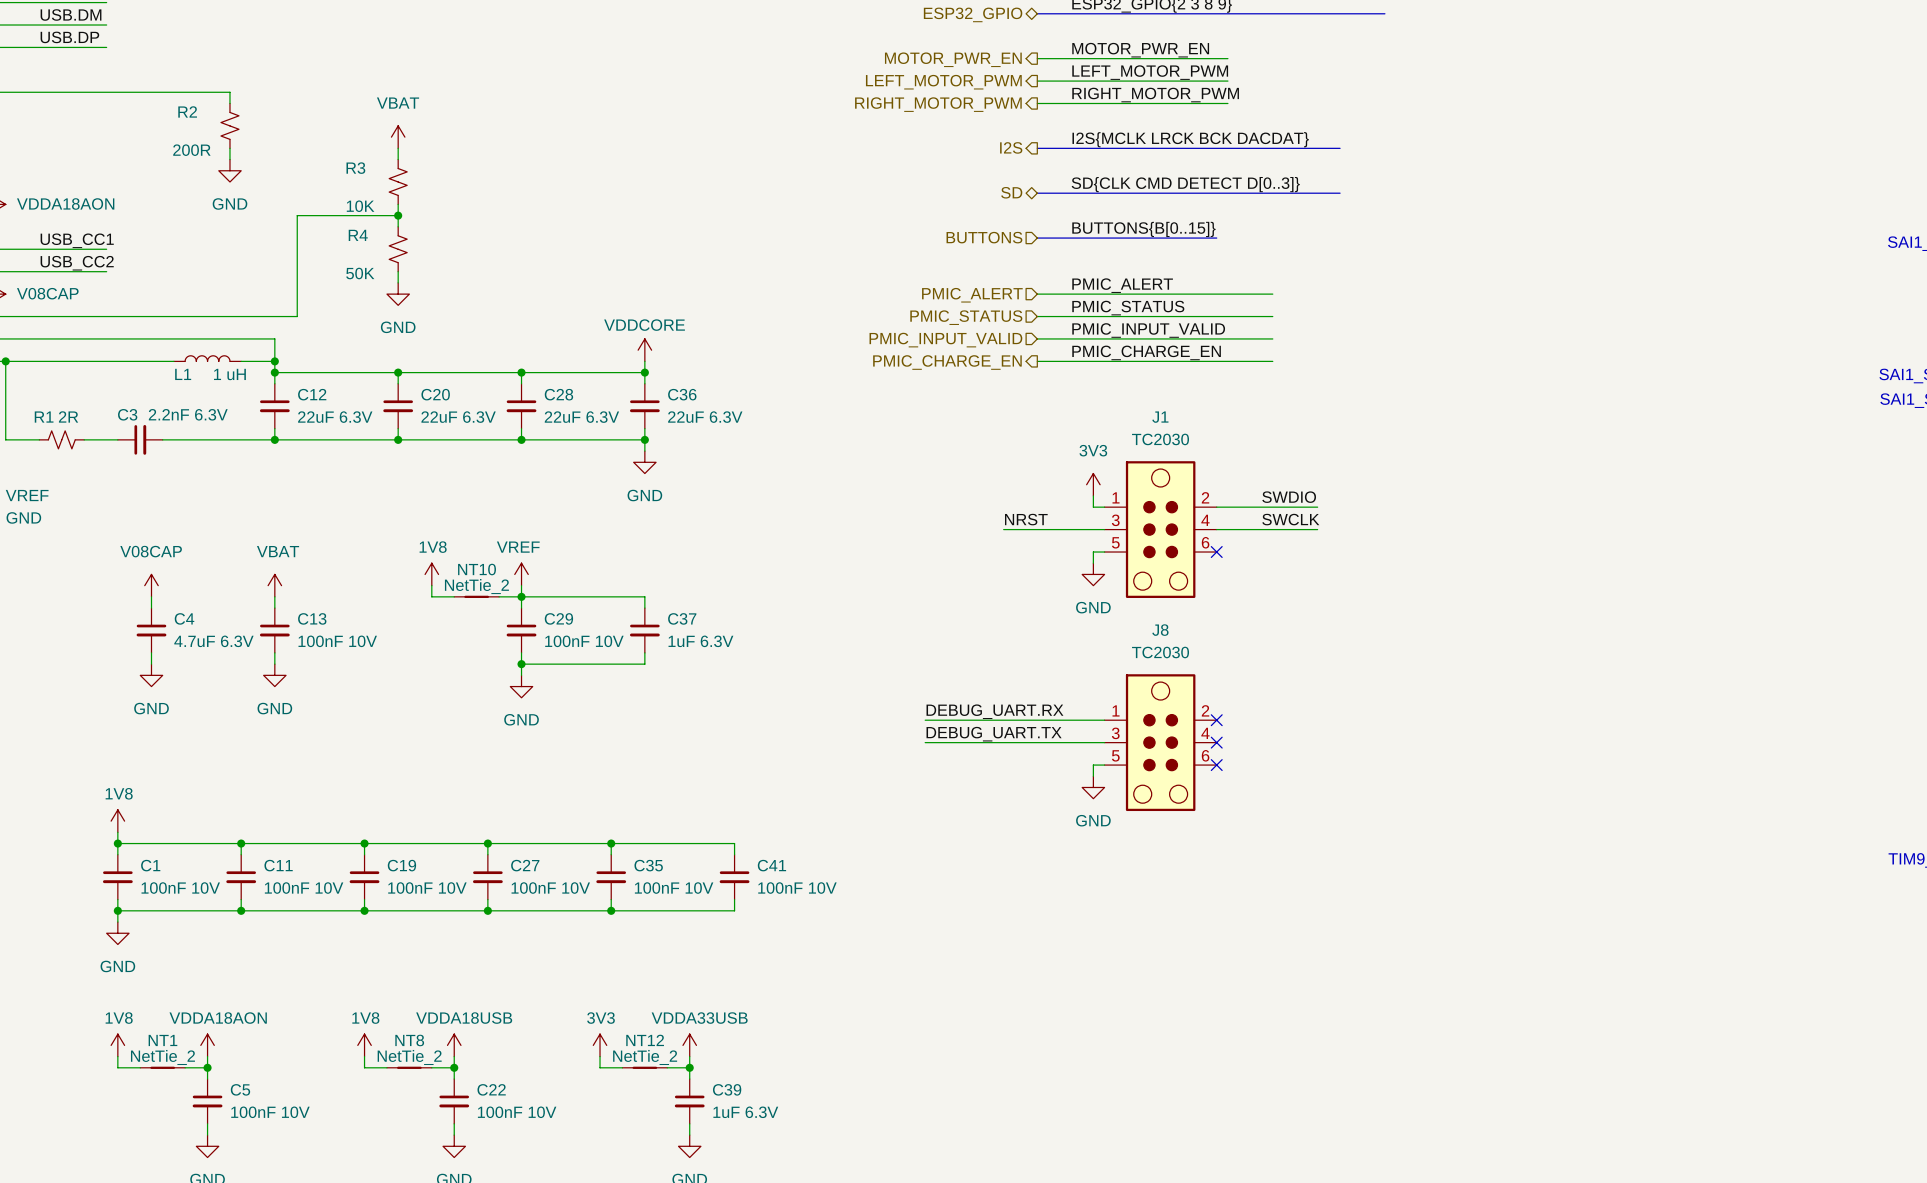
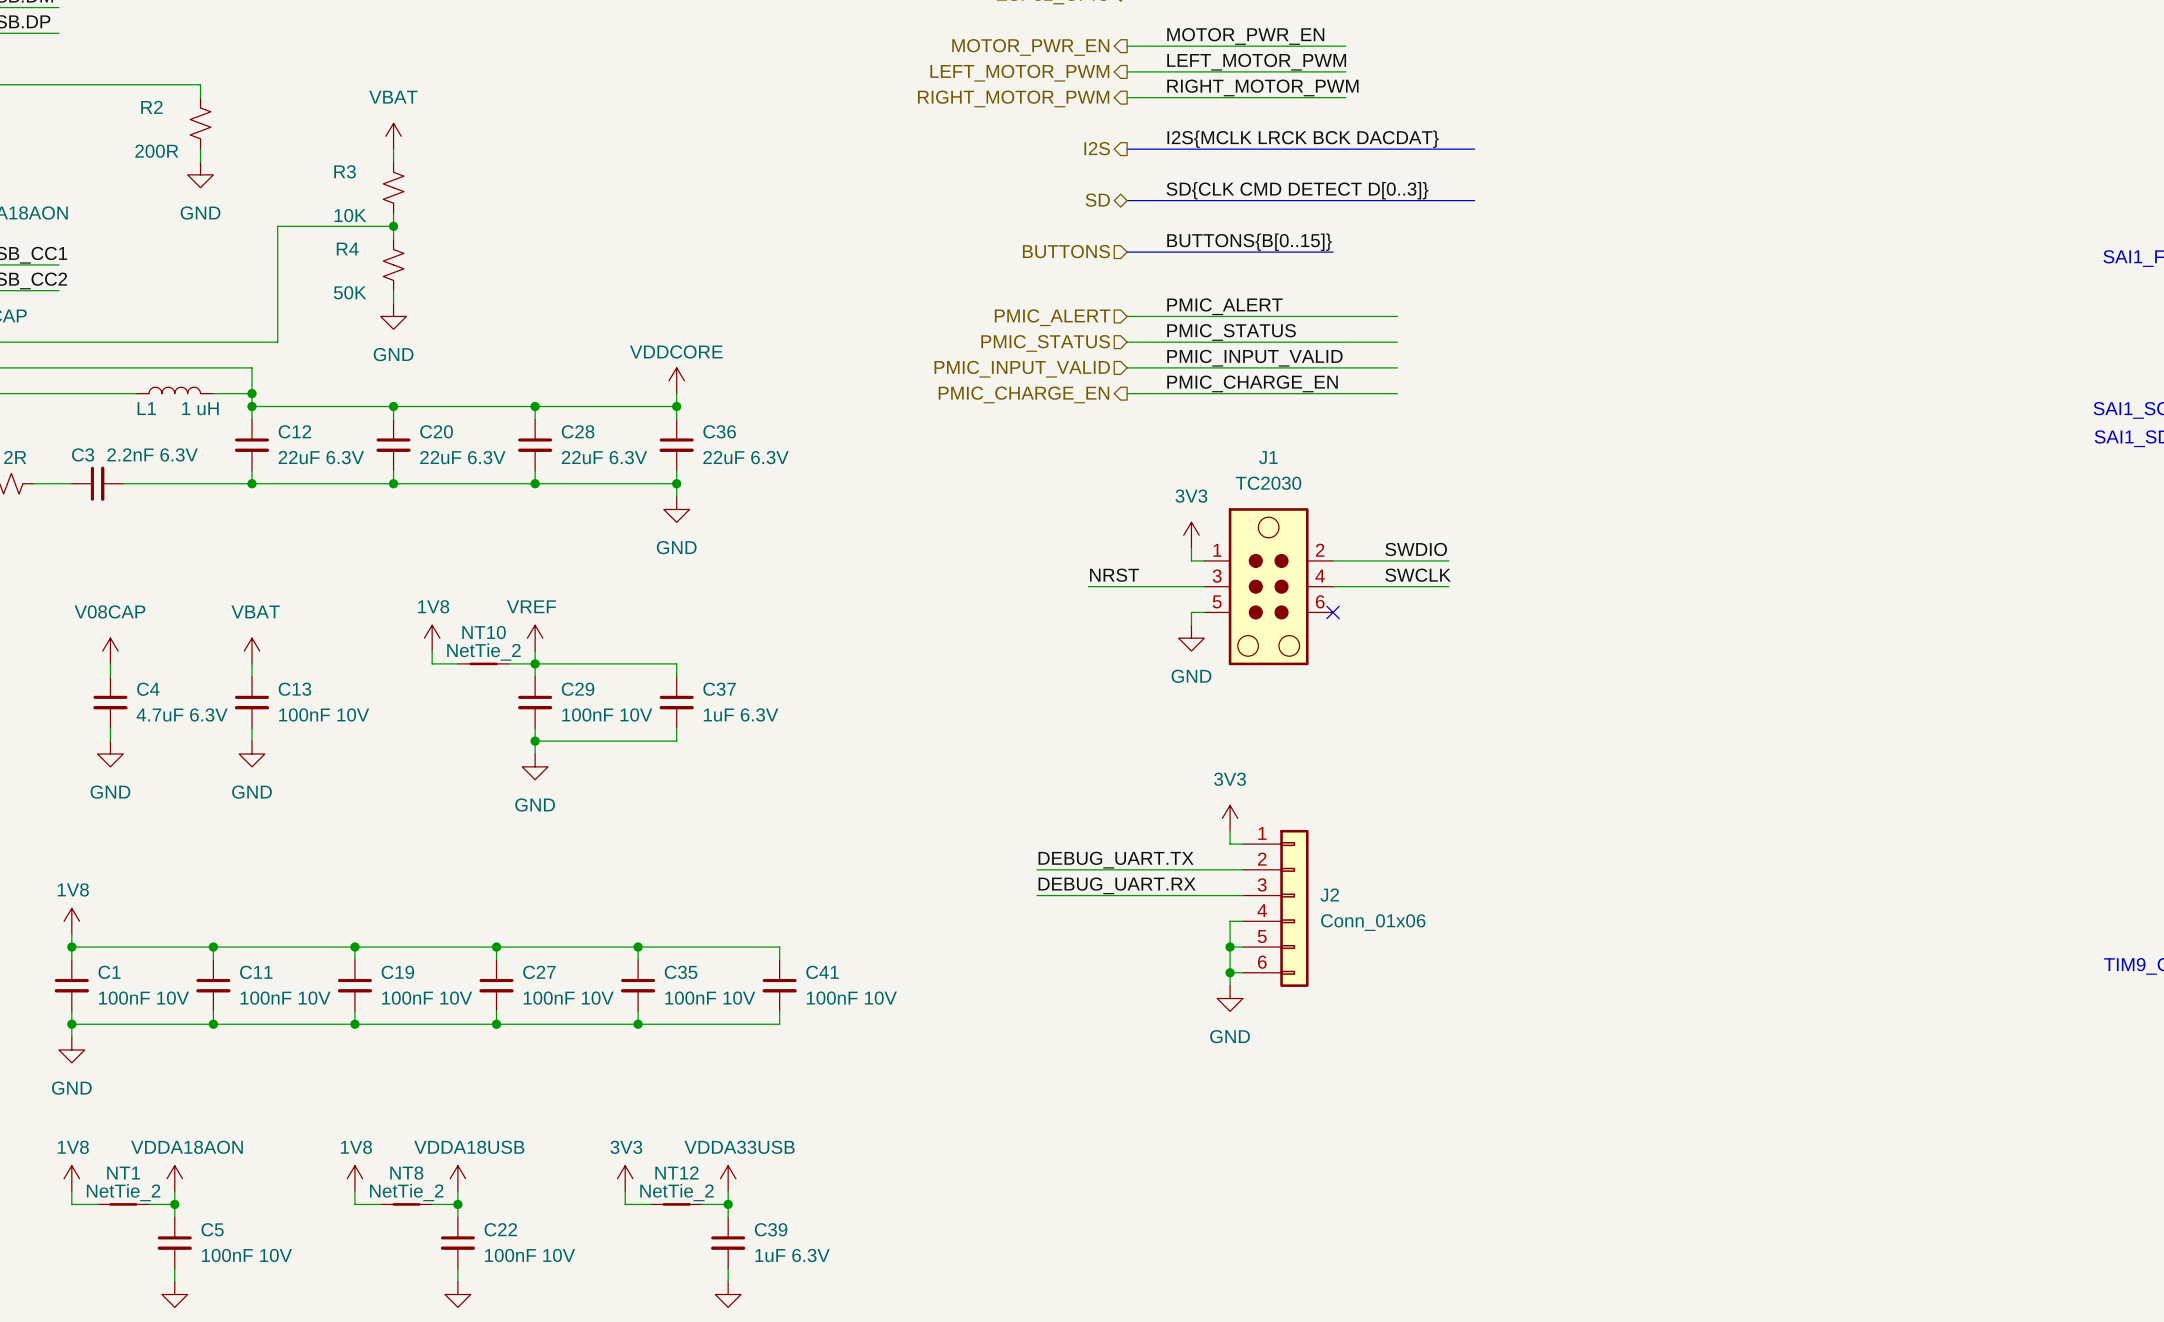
label position: DEBUG_UART.RX (994, 711) -> DEBUG_UART.RX (1117, 885)
wire: (925, 720) (1104, 720) -> (1037, 869) (1242, 869)
no-connect mark: (1216, 720) -> none
power symbol: none -> 3V3 (1230, 818)
label position: DEBUG_UART.TX (994, 734) -> DEBUG_UART.TX (1116, 860)
wire: (925, 742) (1104, 742) -> (1037, 895) (1242, 895)
J8: TC2030 (1160, 742) -> none
no-connect mark: (1216, 742) -> none
wire: (1104, 765) (1093, 765) (1093, 776) -> none
no-connect mark: (1216, 765) -> none
power symbol position: GND (1093, 787) -> GND (1230, 998)
J2: none -> Conn_01x06 (1275, 908)
wire: none -> (1242, 921) (1230, 921) (1230, 985)
wire: none -> (1230, 947) (1242, 947)
junction: none -> (1230, 947)
wire: none -> (1230, 972) (1242, 972)
junction: none -> (1230, 972)

